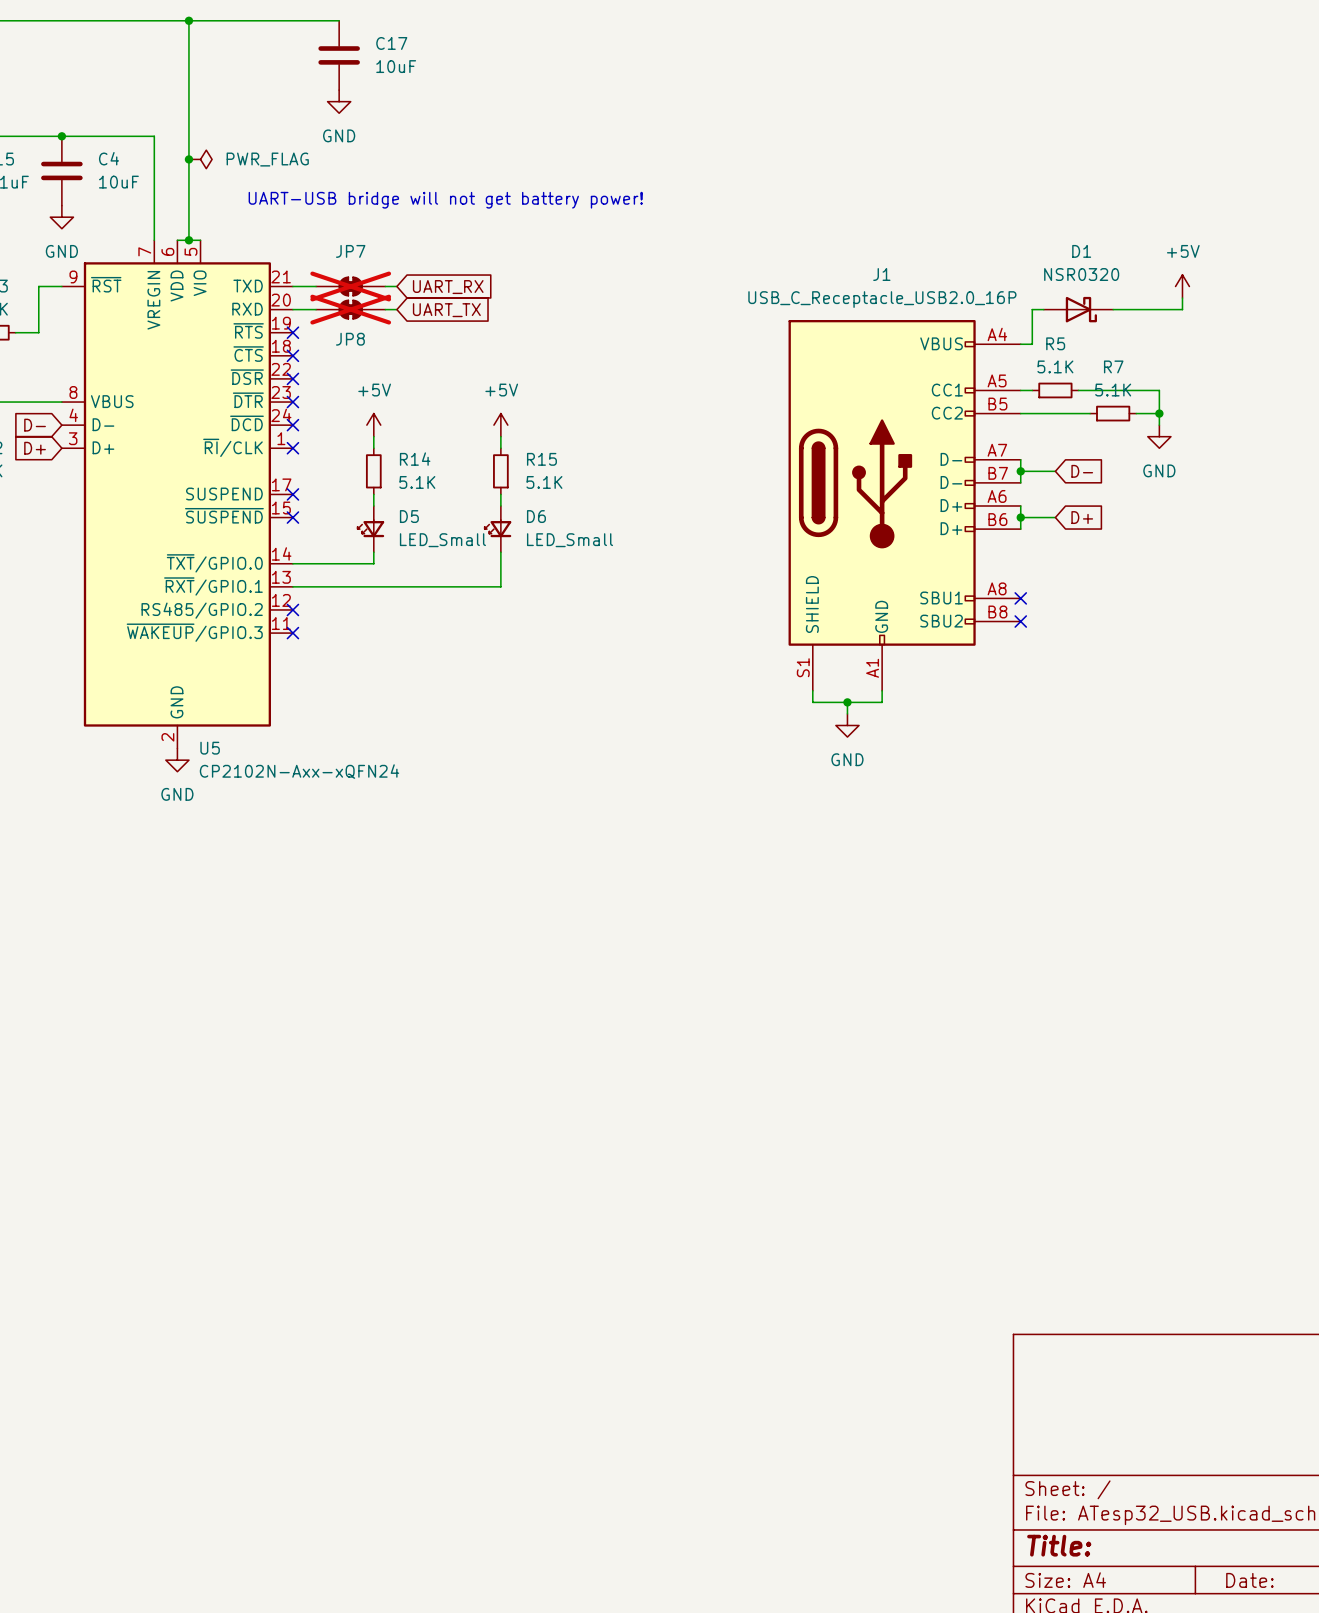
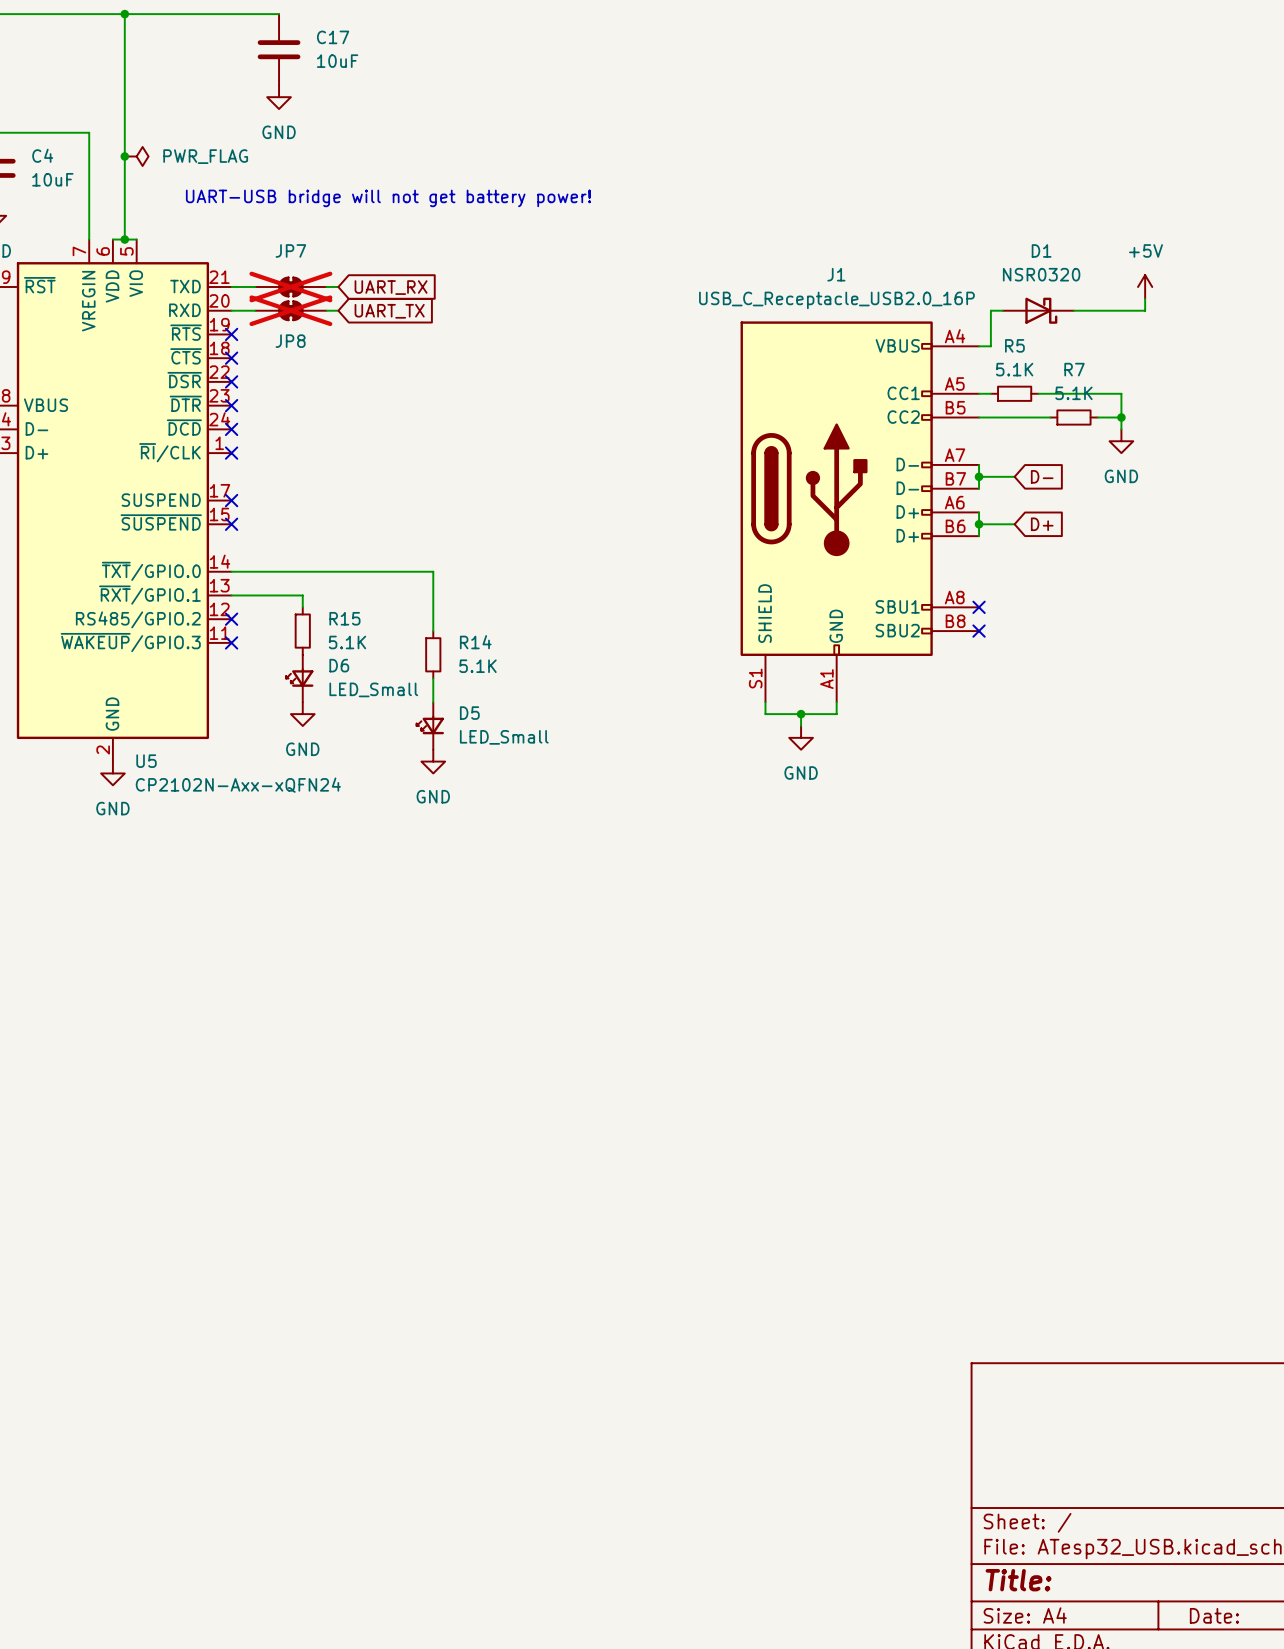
power symbol: +5V (373, 425) -> none
power symbol: +5V (500, 425) -> none
wire: (373, 436) (373, 448) -> none
wire: (500, 436) (500, 448) -> none
R14 position: (373, 471) -> (433, 654)
R15 position: (500, 471) -> (302, 631)
wire: (373, 494) (373, 505) -> none
wire: (500, 494) (500, 505) -> none
D5 position: (370, 529) -> (430, 725)
D6 position: (497, 529) -> (299, 678)
wire: (373, 552) (373, 563) -> (433, 631) (433, 571) (314, 571)
wire: (500, 552) (500, 586) (362, 586) -> (302, 607) (302, 595)
wire: none -> (433, 678) (433, 702)
power symbol: none -> GND (302, 714)
power symbol: none -> GND (433, 761)

